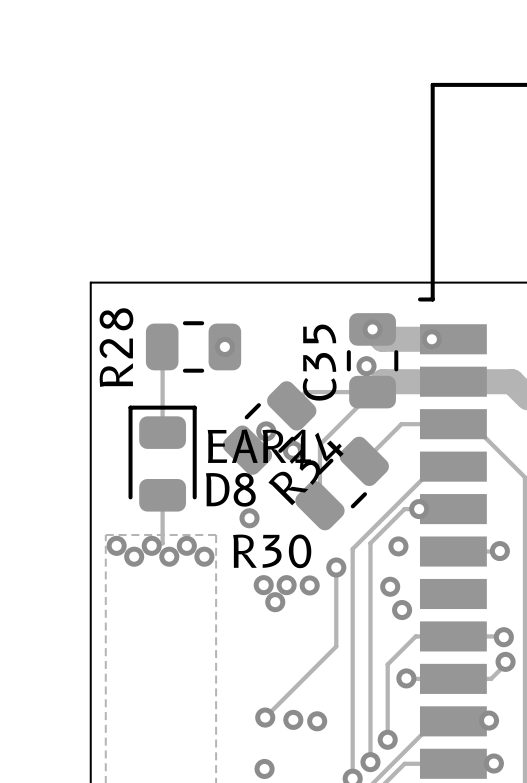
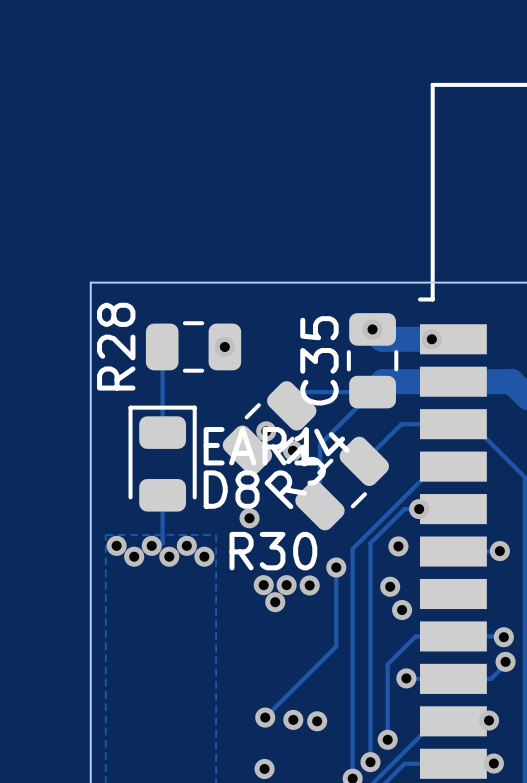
via: (366, 366) -> none

